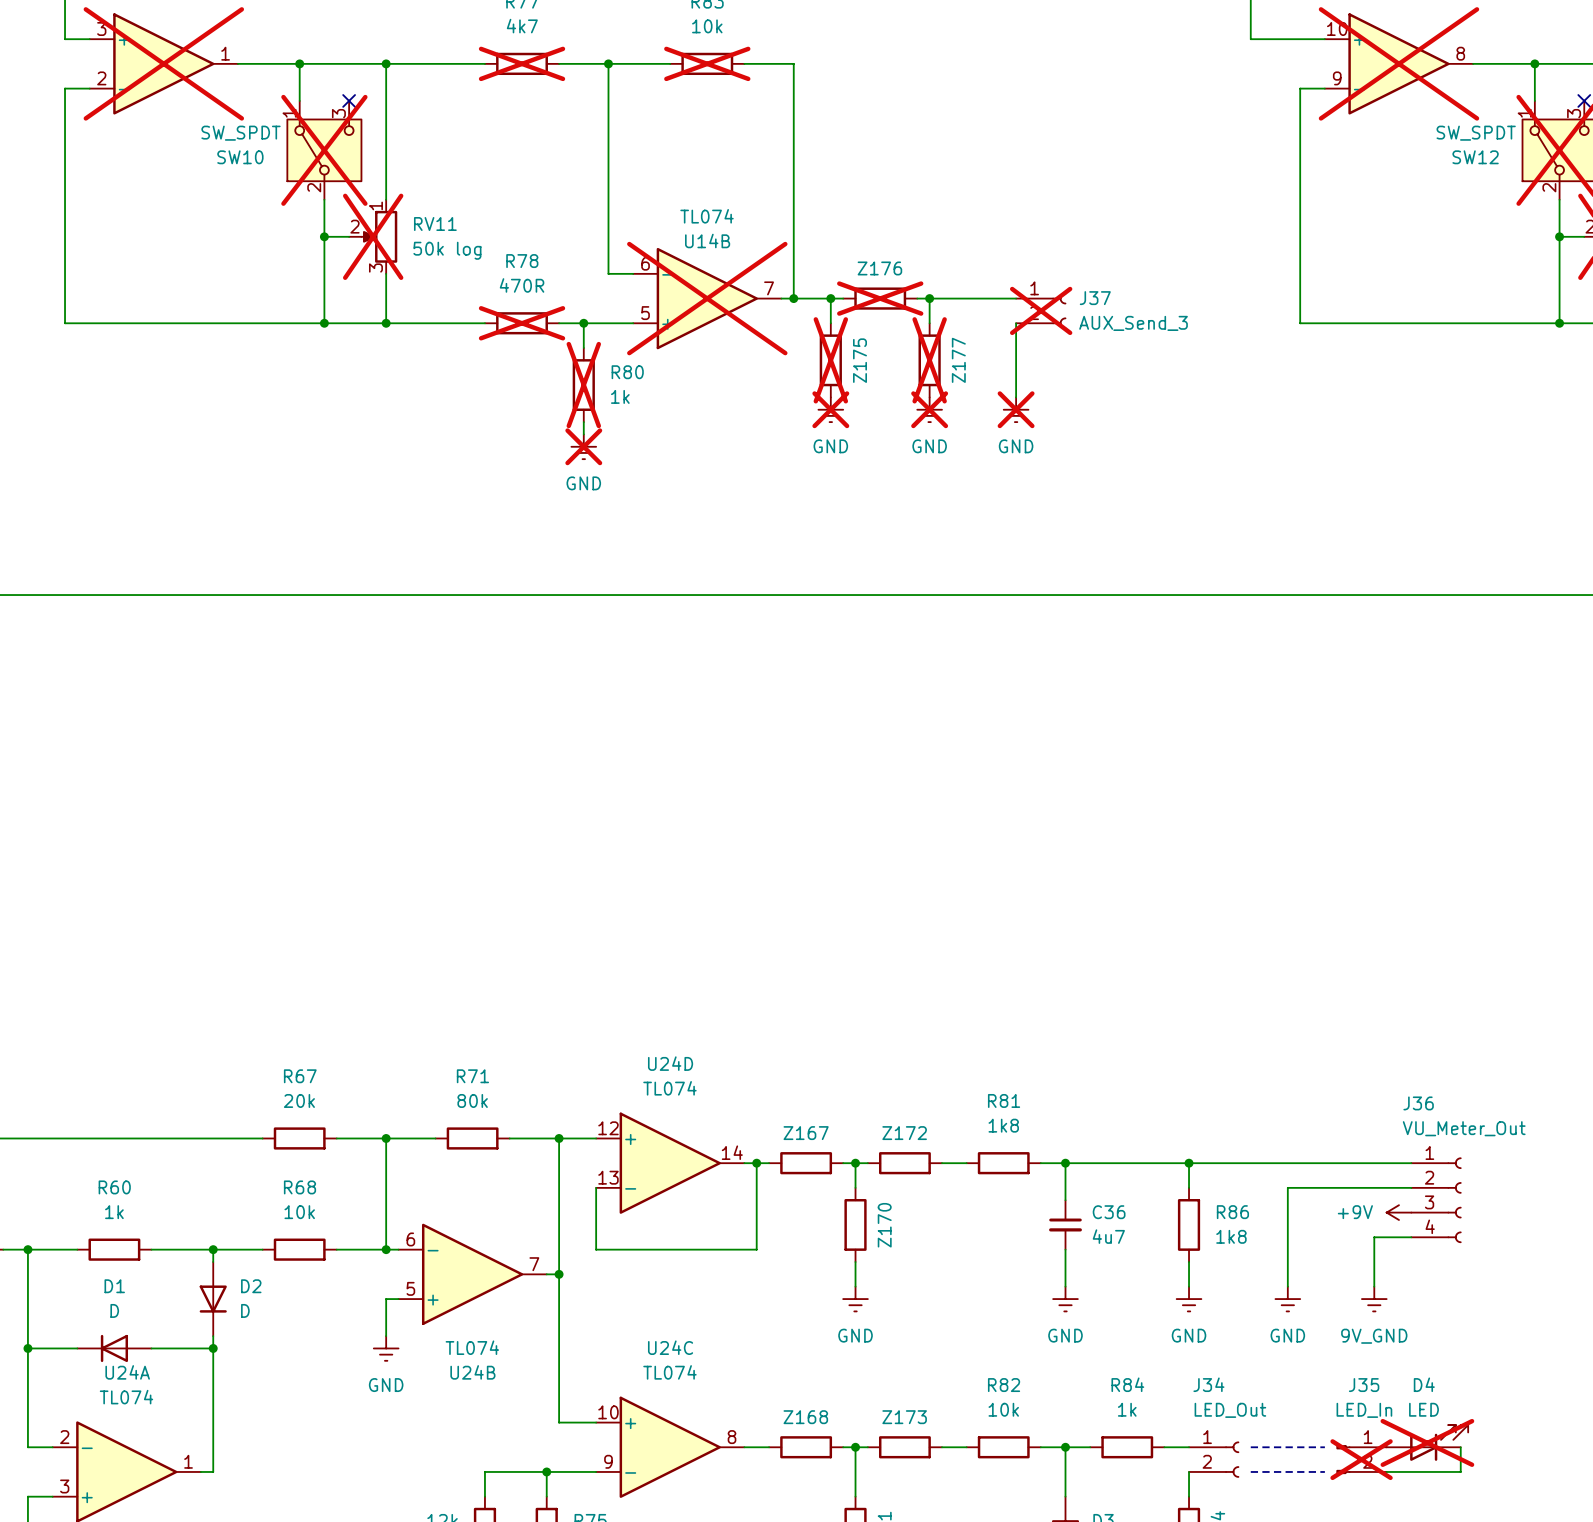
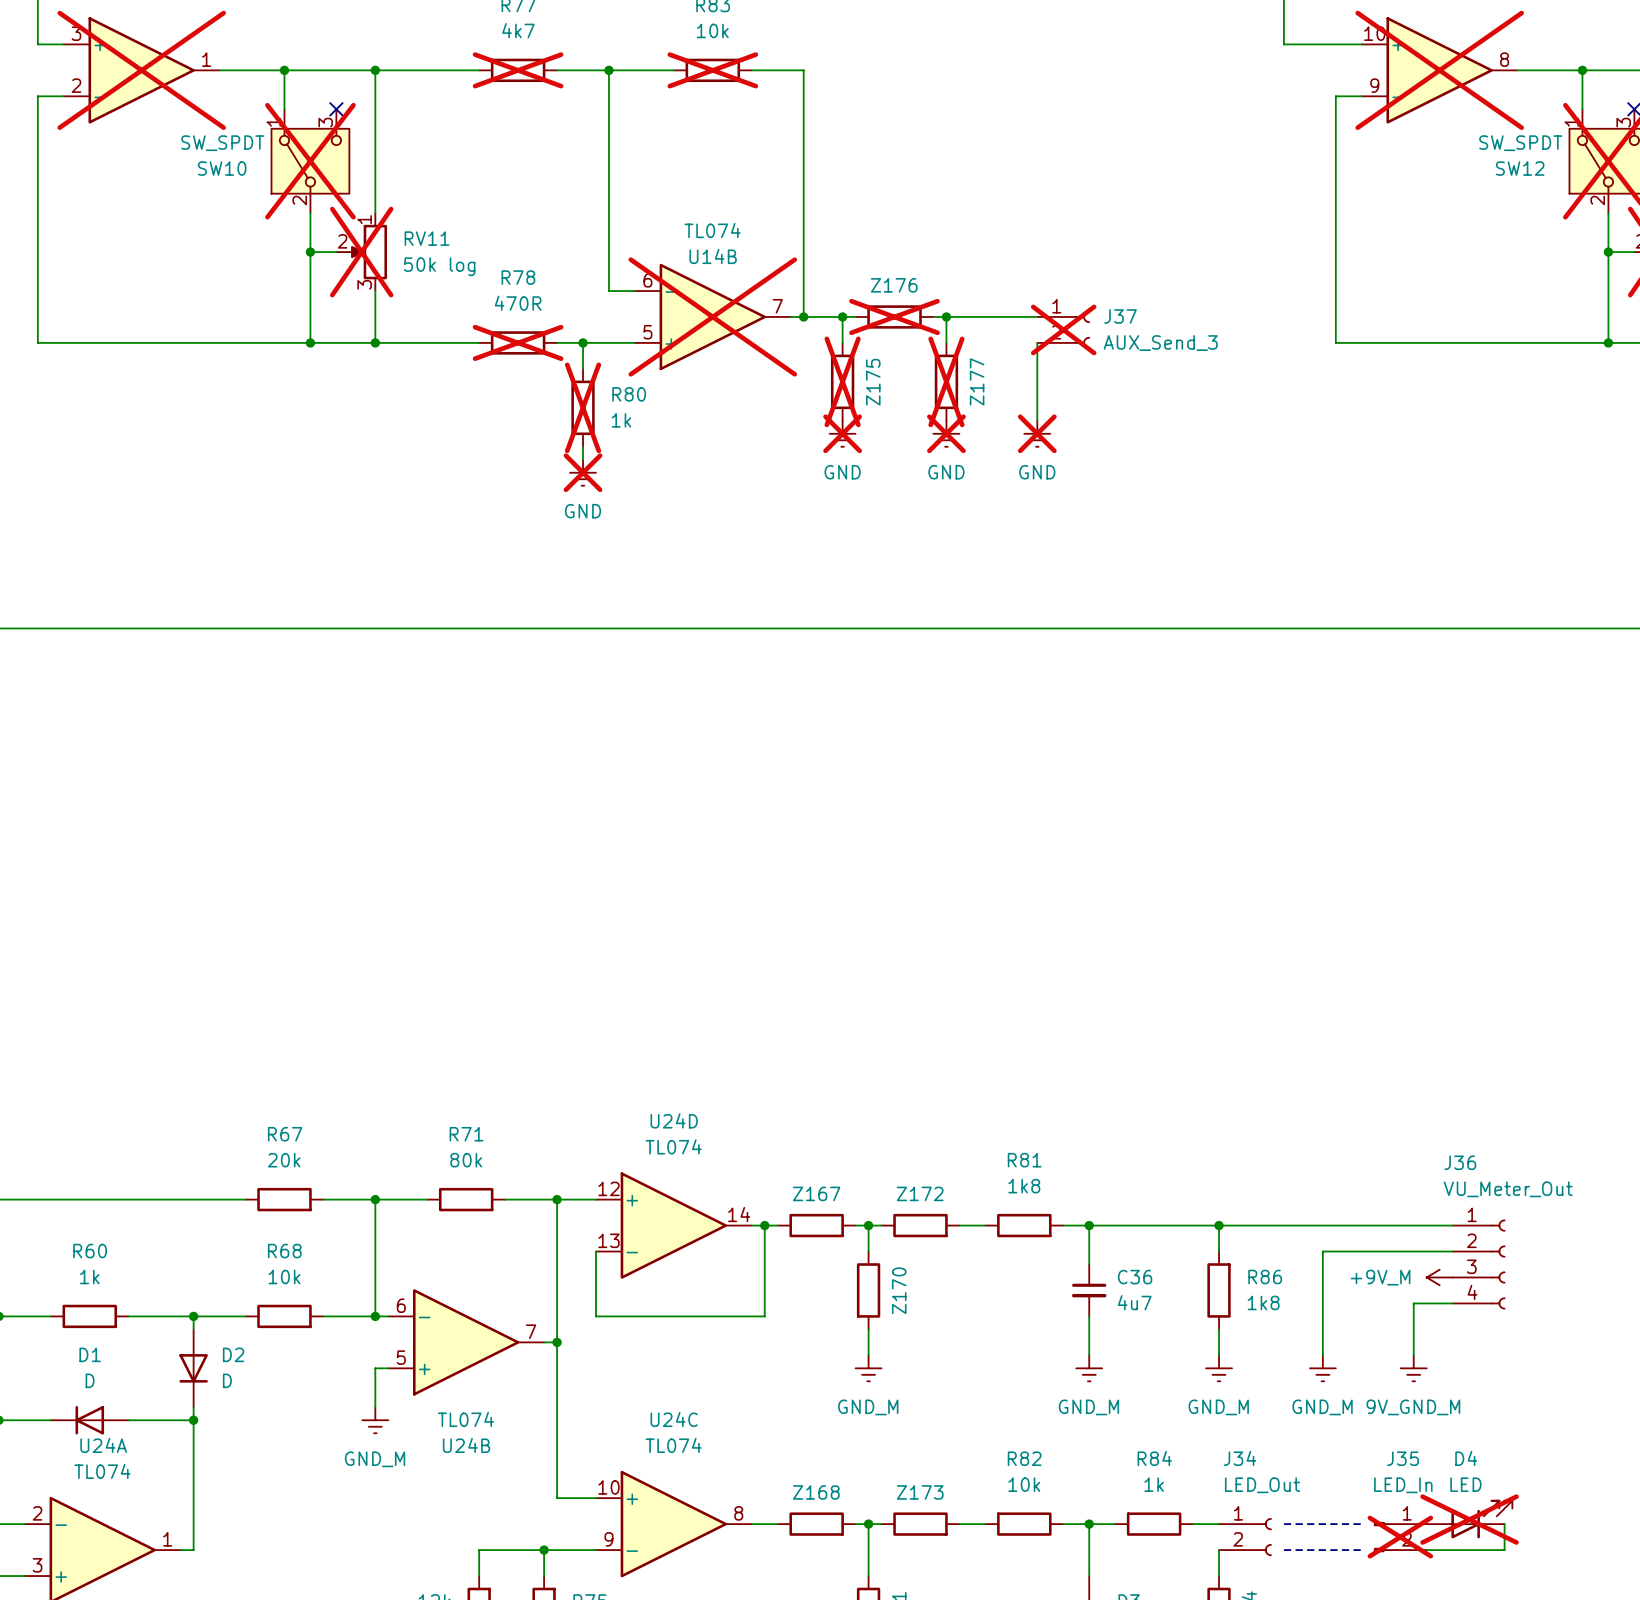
power symbol: +9V (1398, 1212) -> +9V_M (1439, 1277)
power symbol: GND (855, 1299) -> GND_M (868, 1368)
power symbol: GND (1065, 1299) -> GND_M (1089, 1368)
power symbol: GND (1189, 1299) -> GND_M (1219, 1368)
power symbol: GND (1287, 1299) -> GND_M (1322, 1368)
power symbol: 9V_GND (1374, 1299) -> 9V_GND_M (1413, 1368)
power symbol: GND (386, 1348) -> GND_M (375, 1420)

